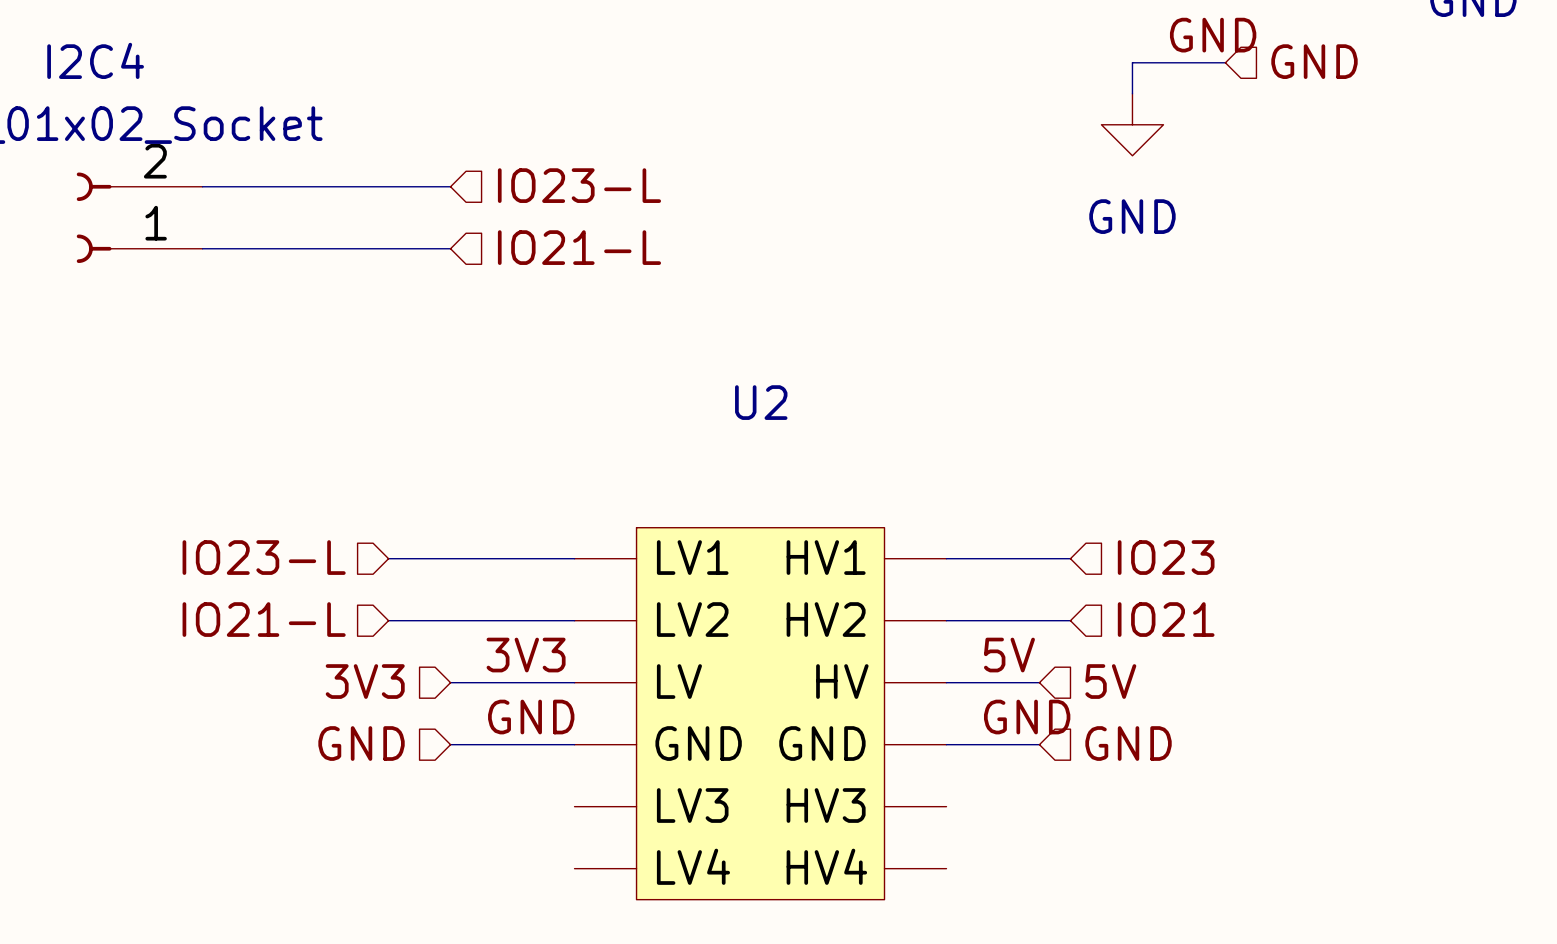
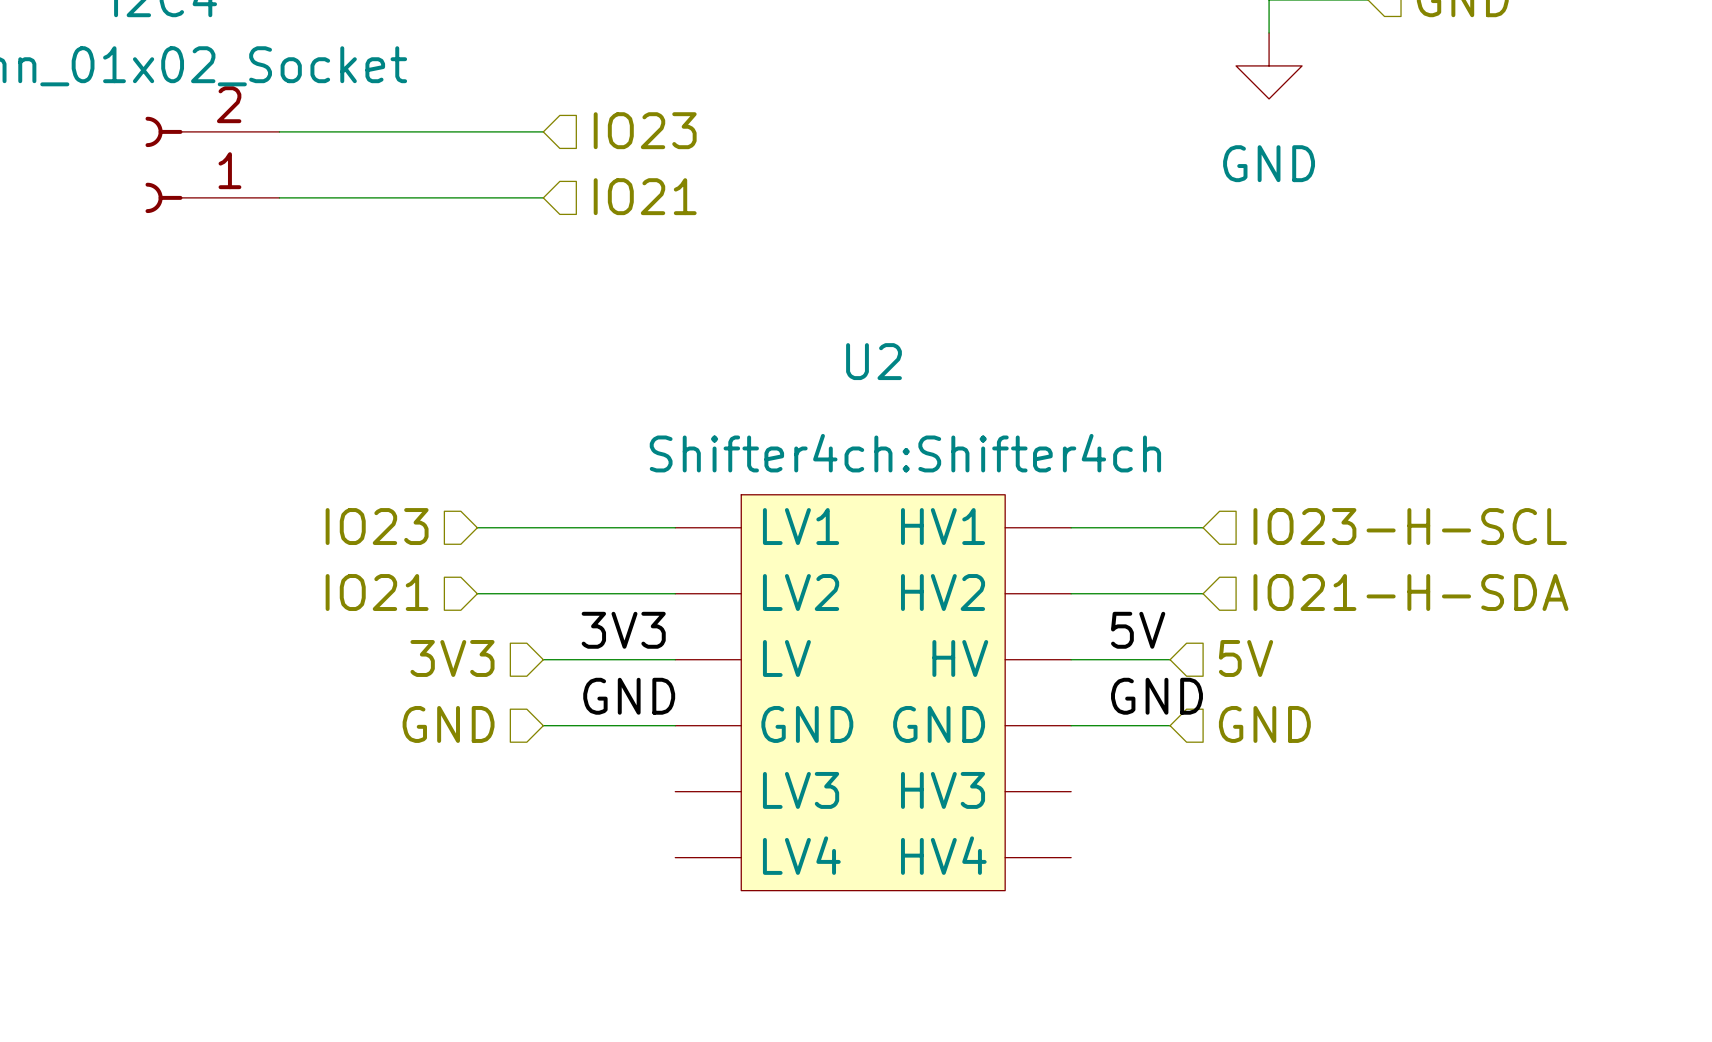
hierarchical label: IO23-L (579, 185) -> IO23 (645, 130)
hierarchical label: IO21-L (579, 247) -> IO21 (645, 196)
U2 text: none -> Shifter4ch:Shifter4ch (905, 453)
hierarchical label: IO23-L (264, 557) -> IO23 (377, 526)
hierarchical label: IO23 (1166, 557) -> IO23-H-SCL (1410, 526)
hierarchical label: IO21-L (264, 619) -> IO21 (377, 592)
hierarchical label: IO21 (1166, 619) -> IO21-H-SDA (1410, 592)

